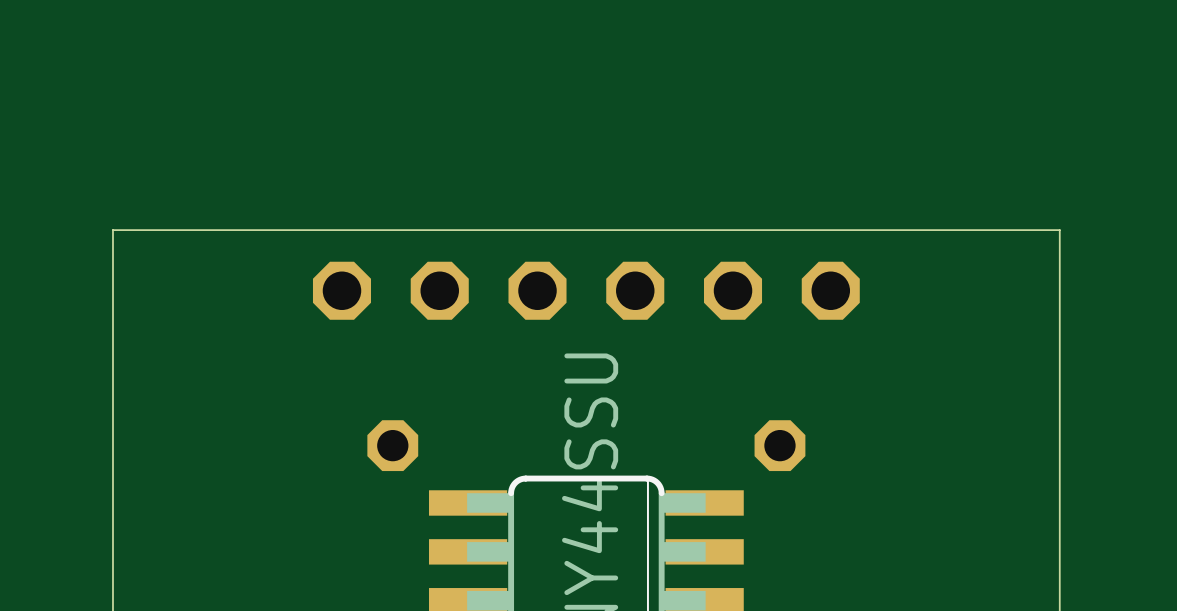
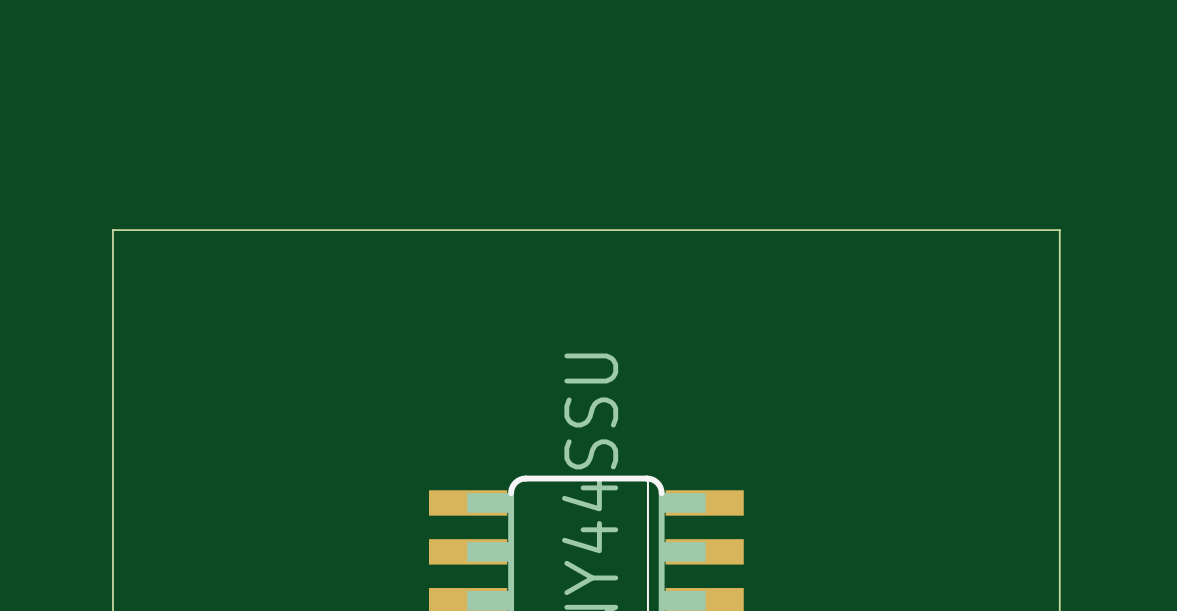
part: (586, 290) -> none
part: (392, 445) -> none
part: (779, 445) -> none

